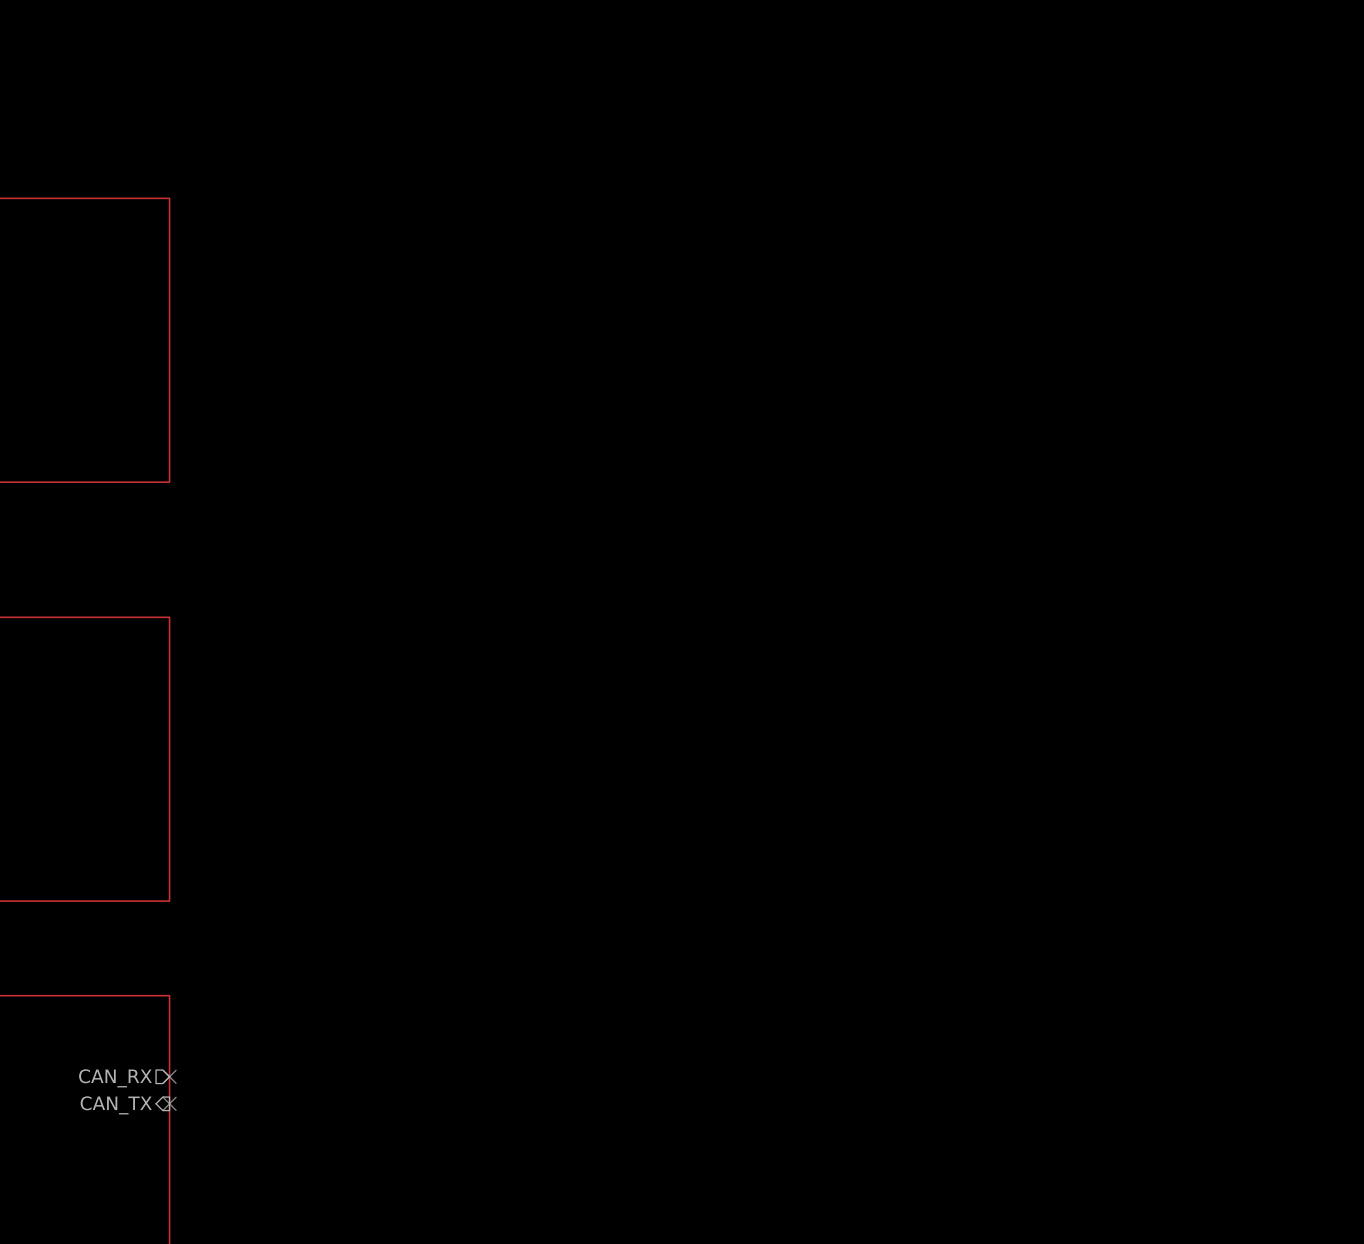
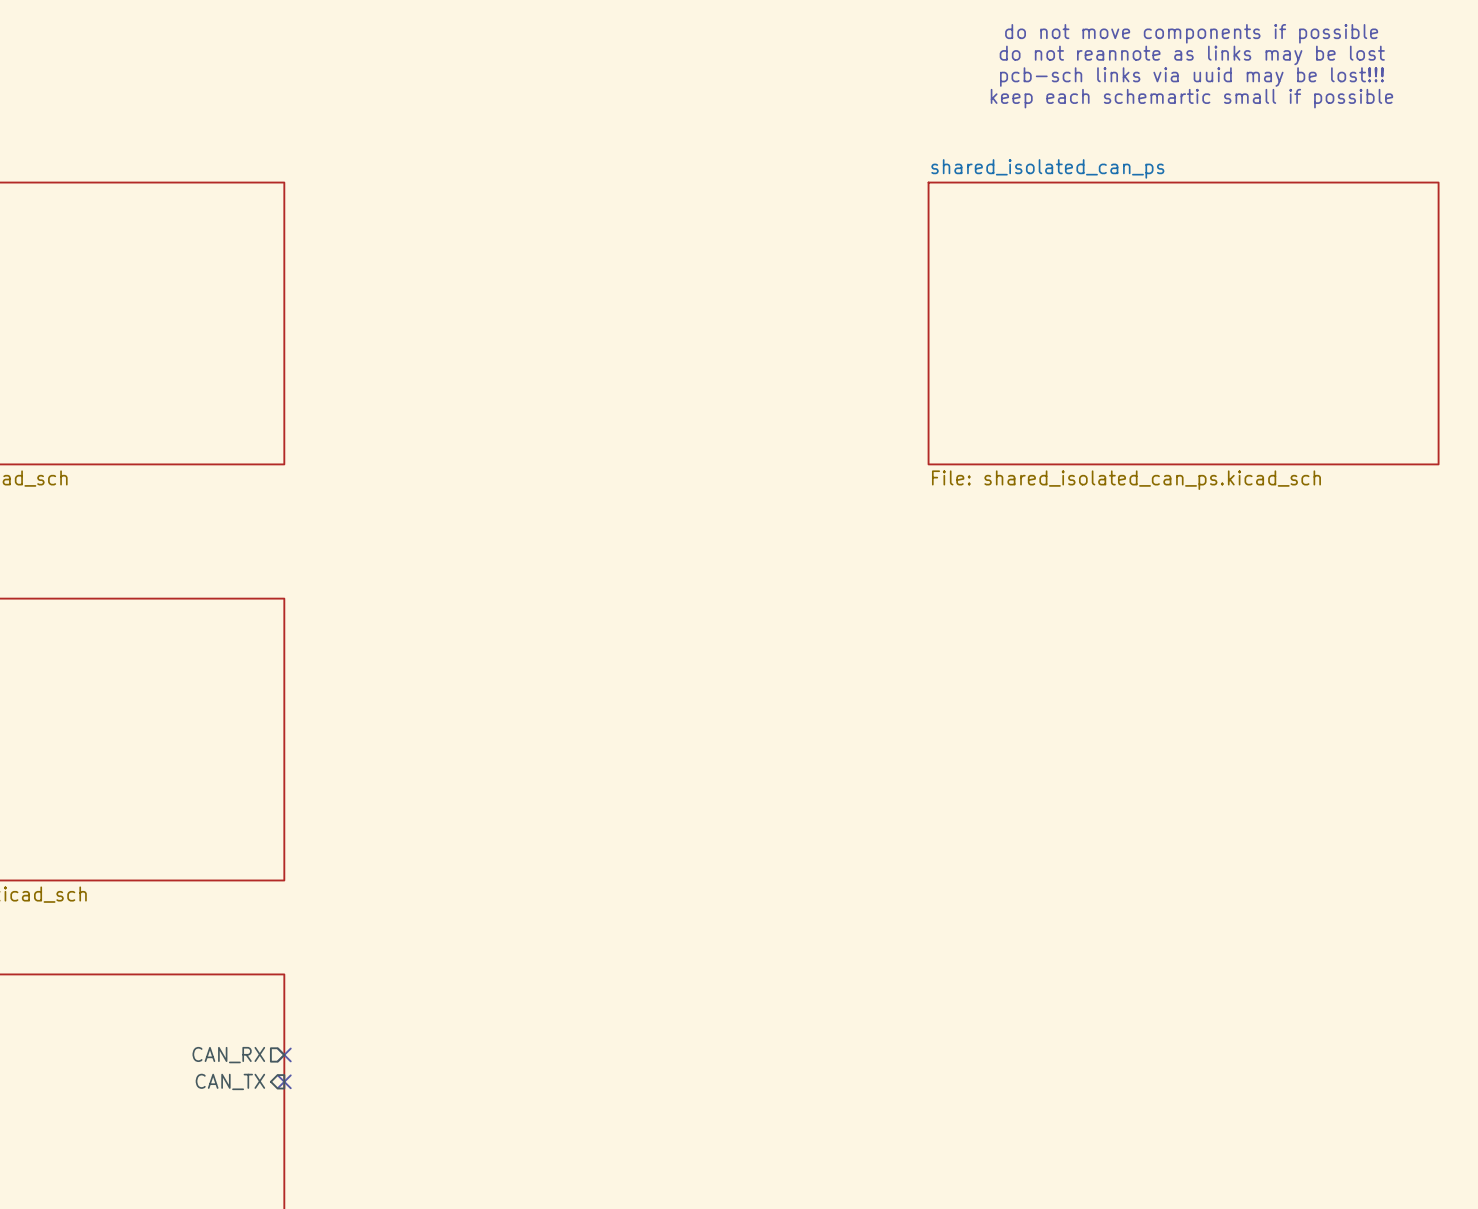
text: none -> do not move components if possible (1191, 33)
text: none -> do not reannote as links may be lost (1192, 55)
text: none -> pcb-sch links via uuid may be lost!!! (1191, 77)
text: none -> keep each schemartic small if possible (1191, 98)
sheet shared_isolated_can_ps: none -> File: shared_isolated_can_ps.kicad_sch (1183, 323)

